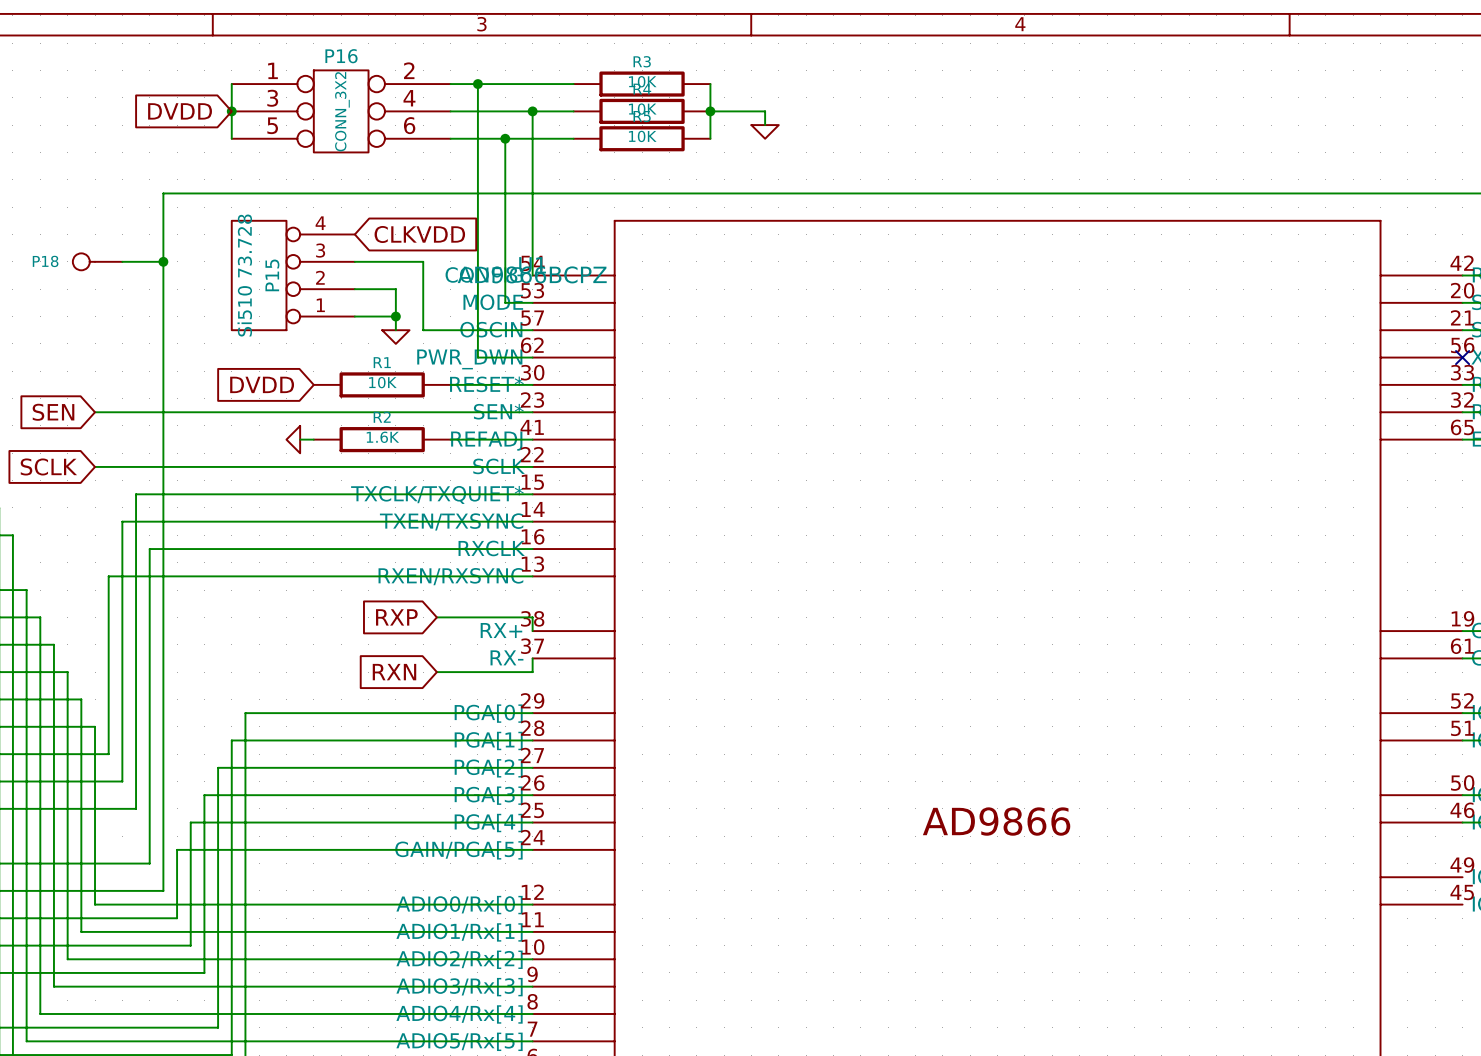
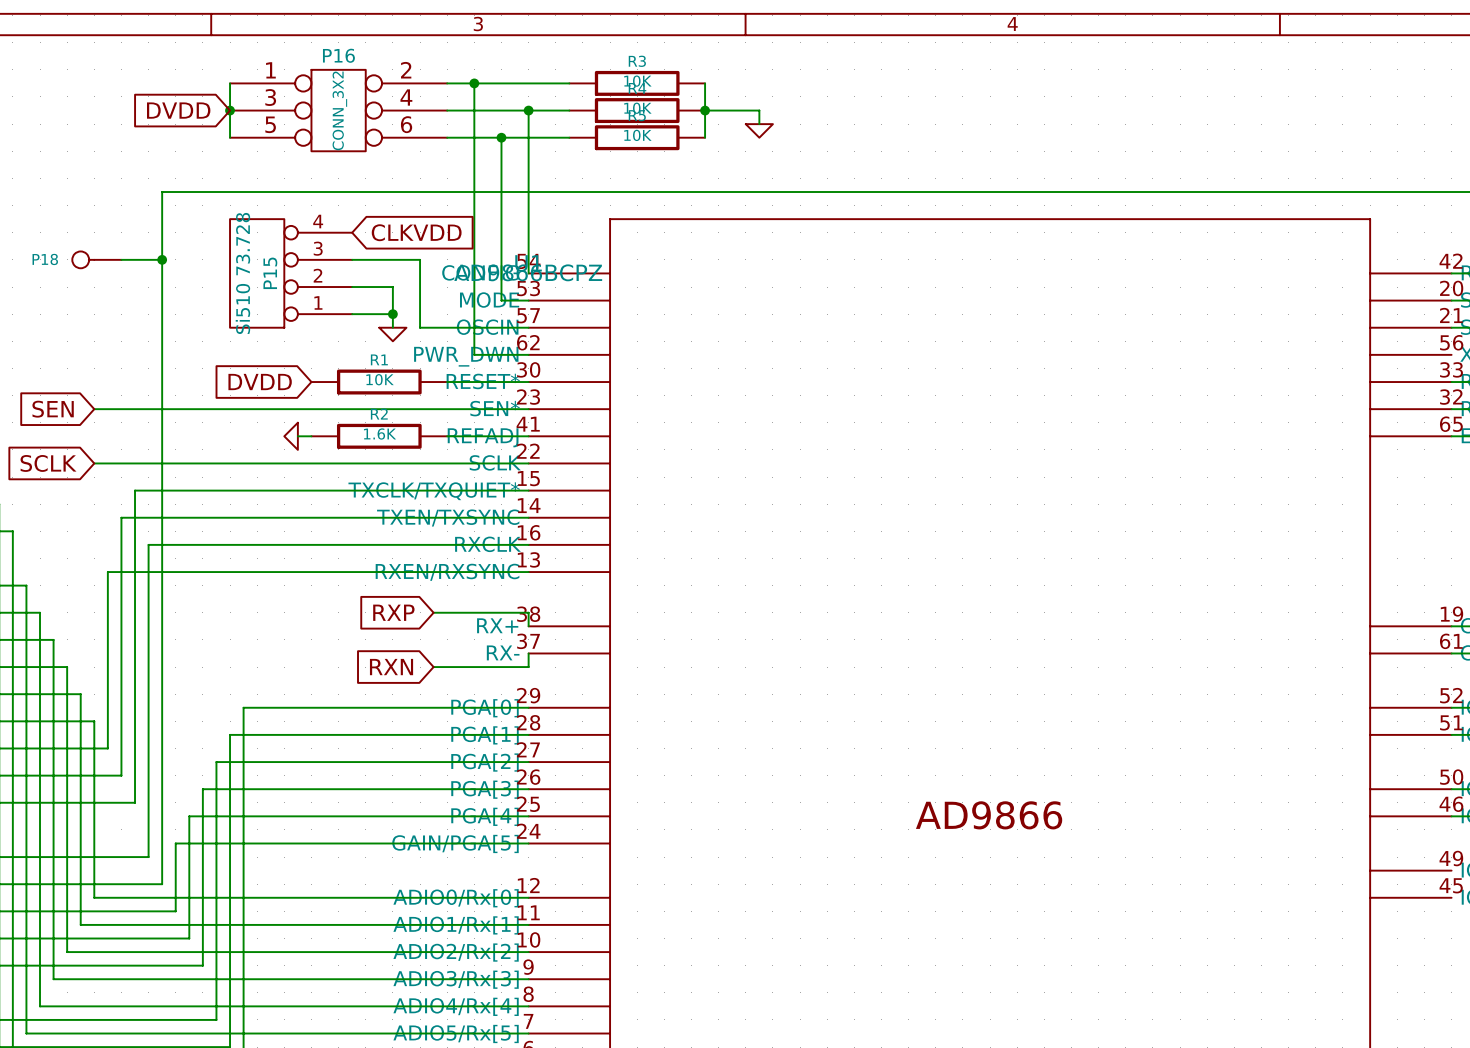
no-connect mark: (1462, 357) -> none

